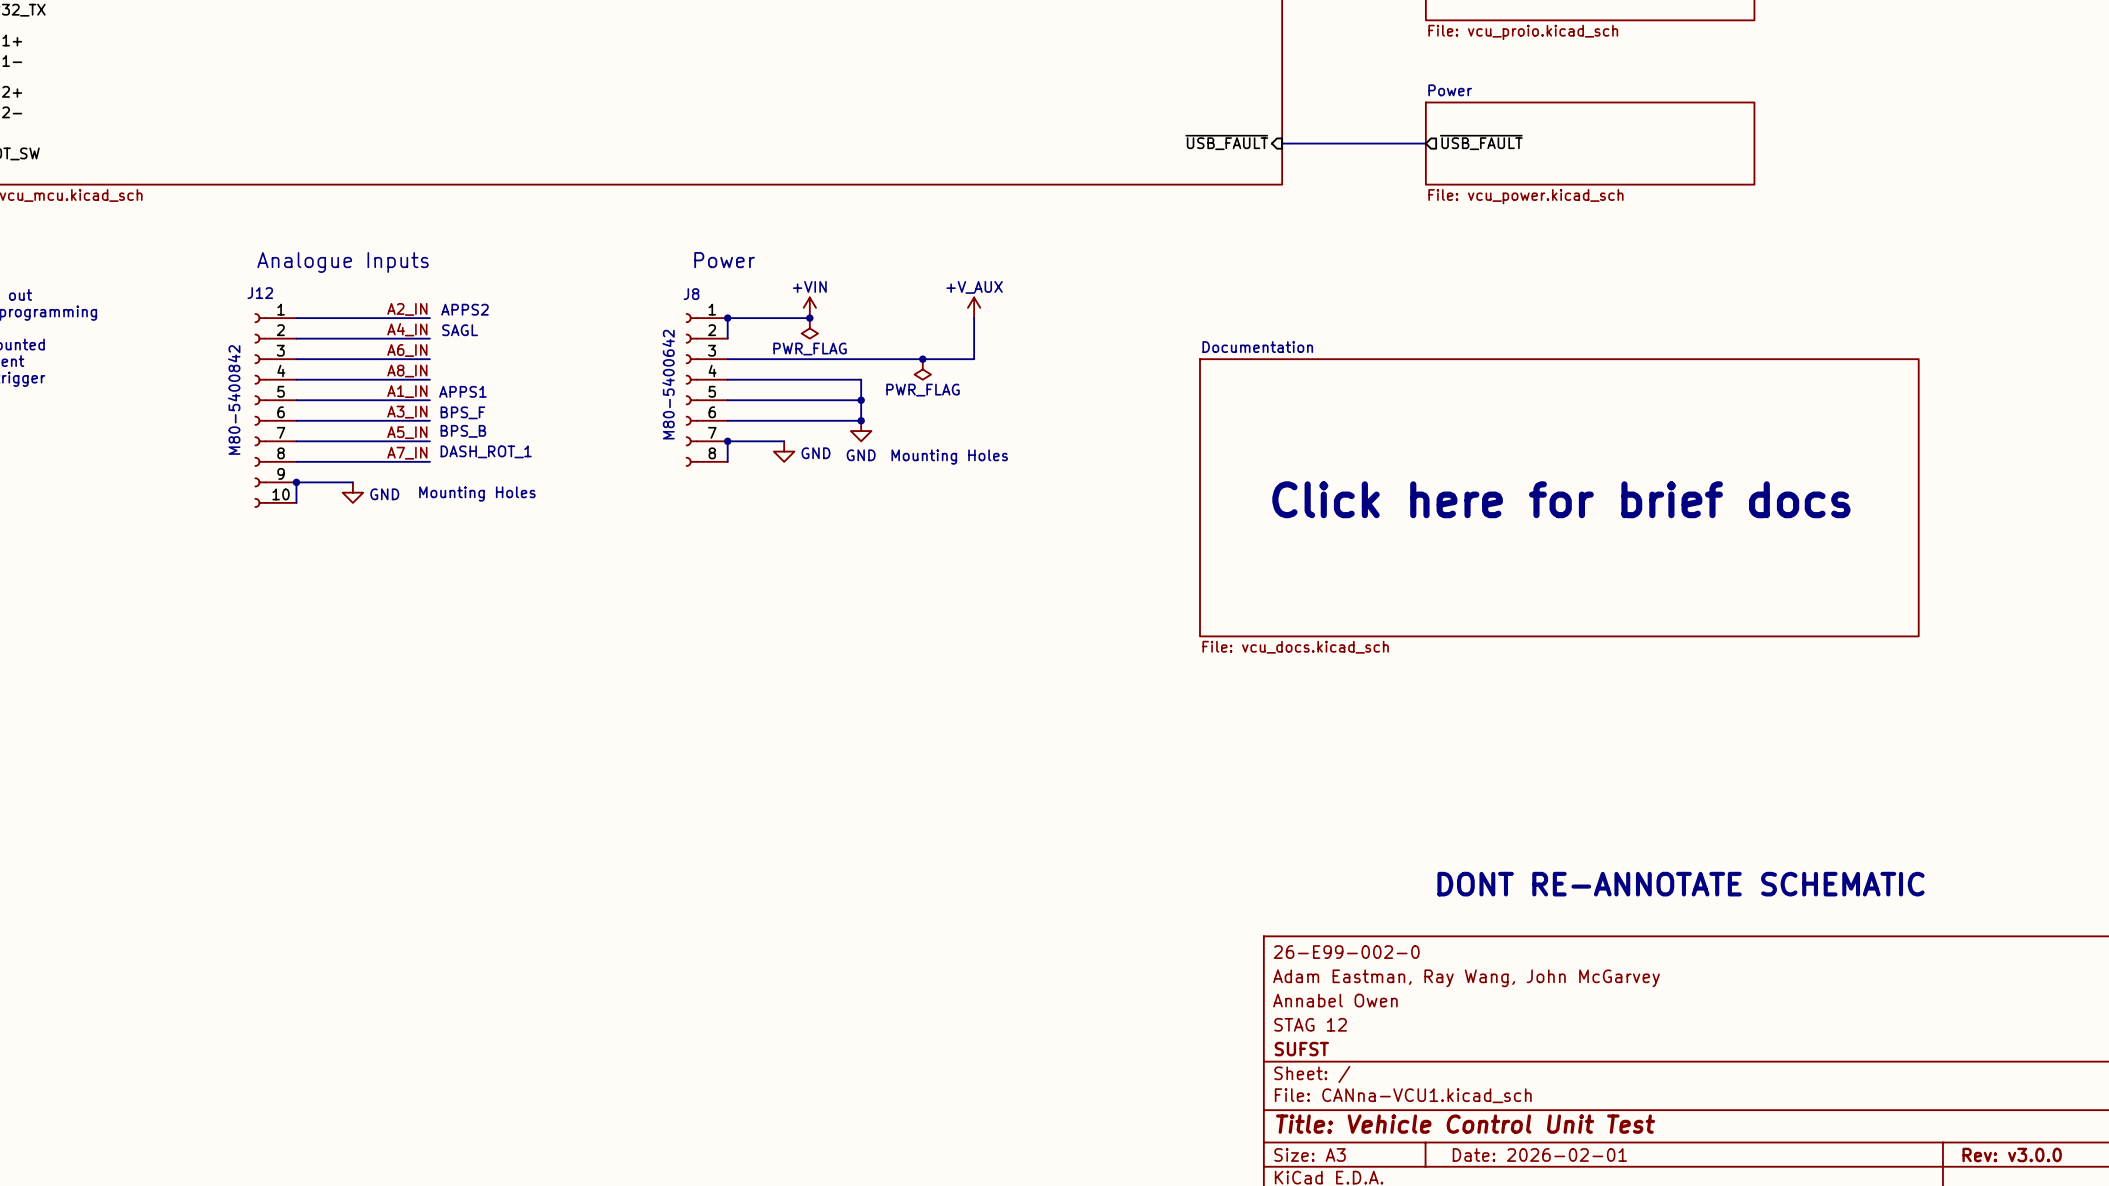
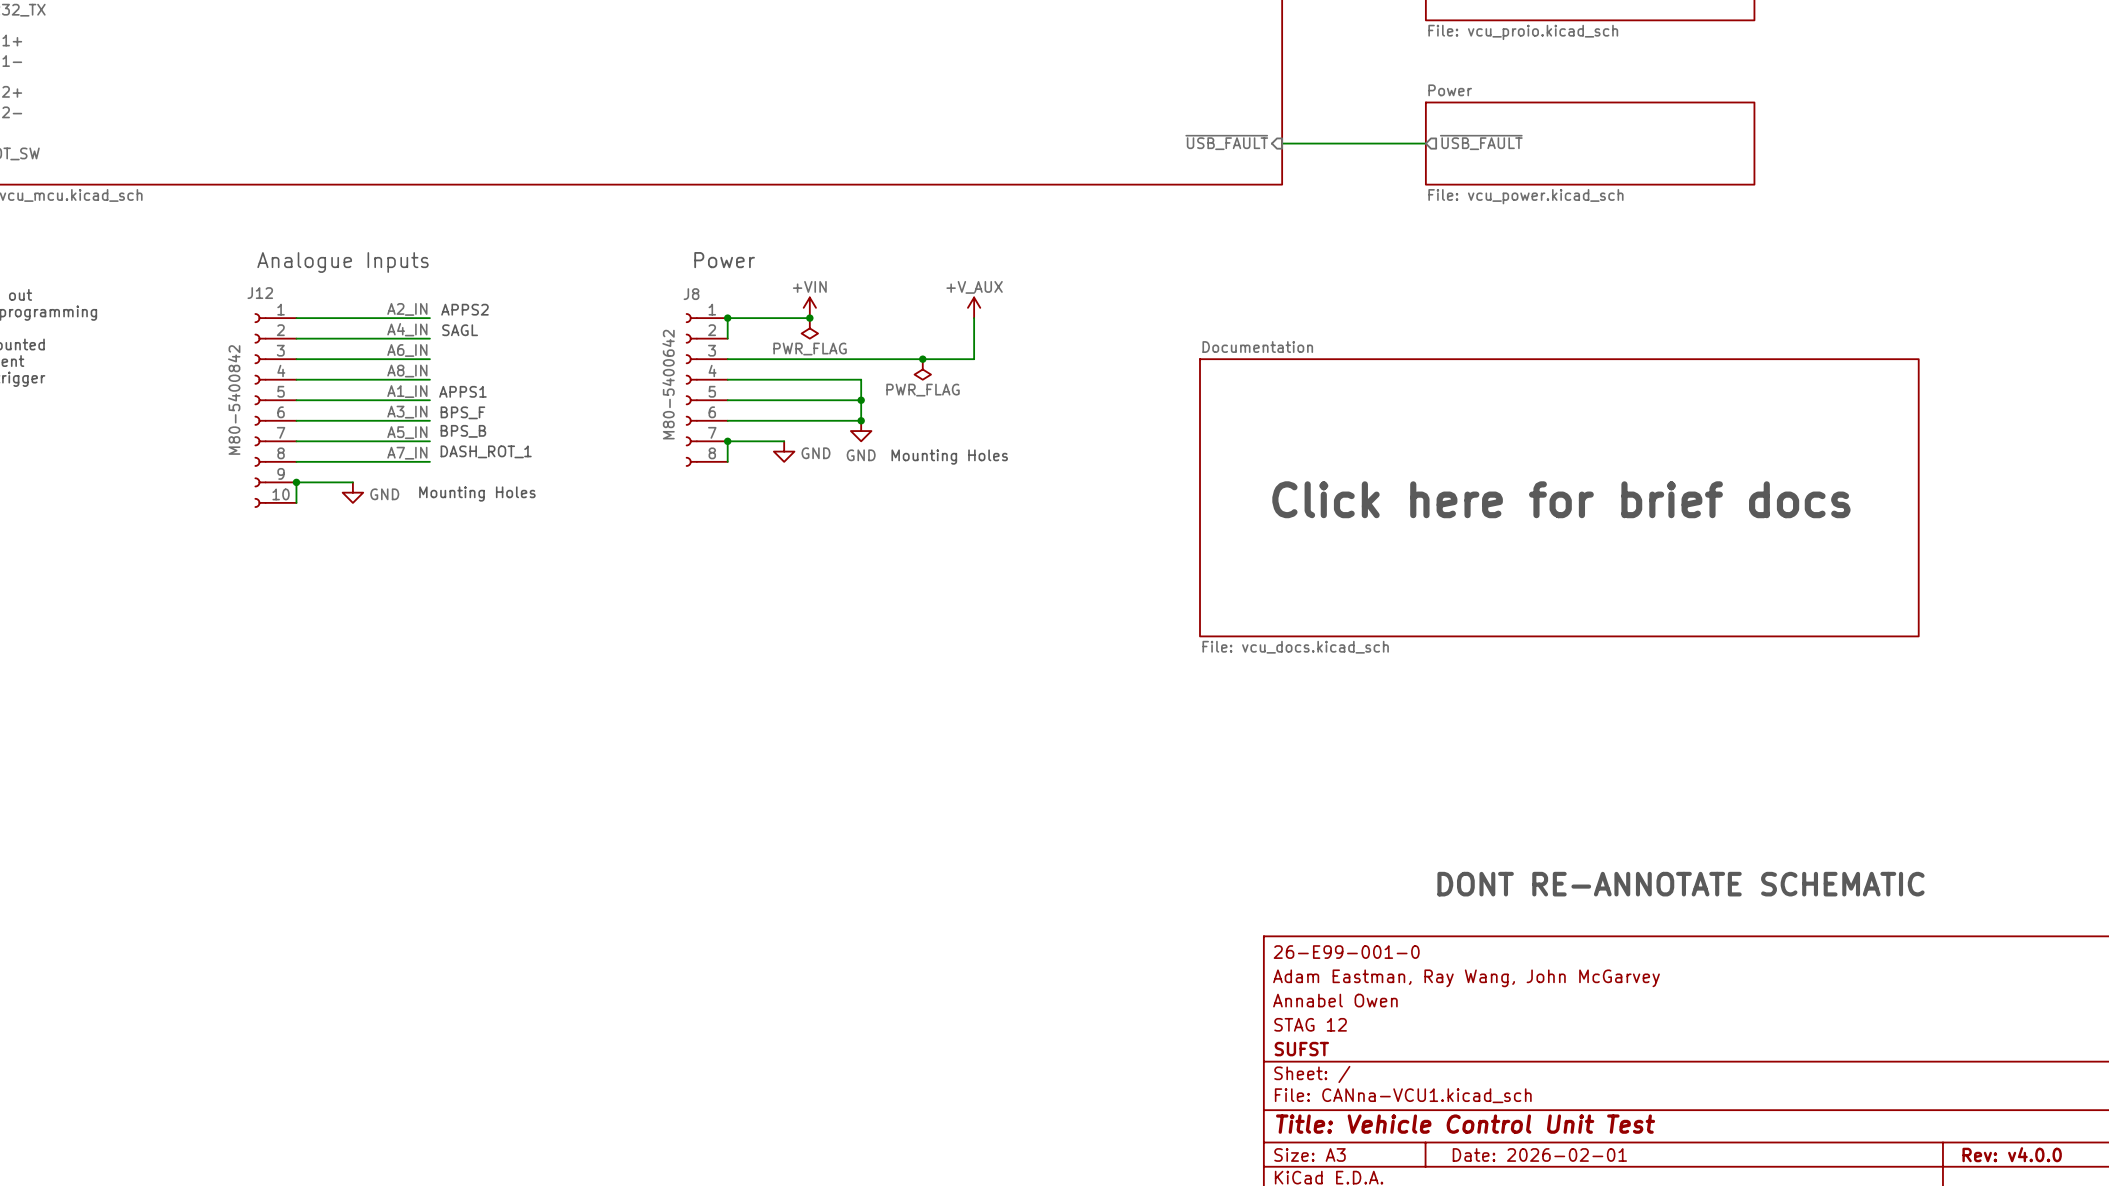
title block: 26-E99-002-0 (1346, 952) -> 26-E99-001-0 (1346, 952)
title block: Rev: v3.0.0 (2012, 1154) -> Rev: v4.0.0 (2012, 1154)

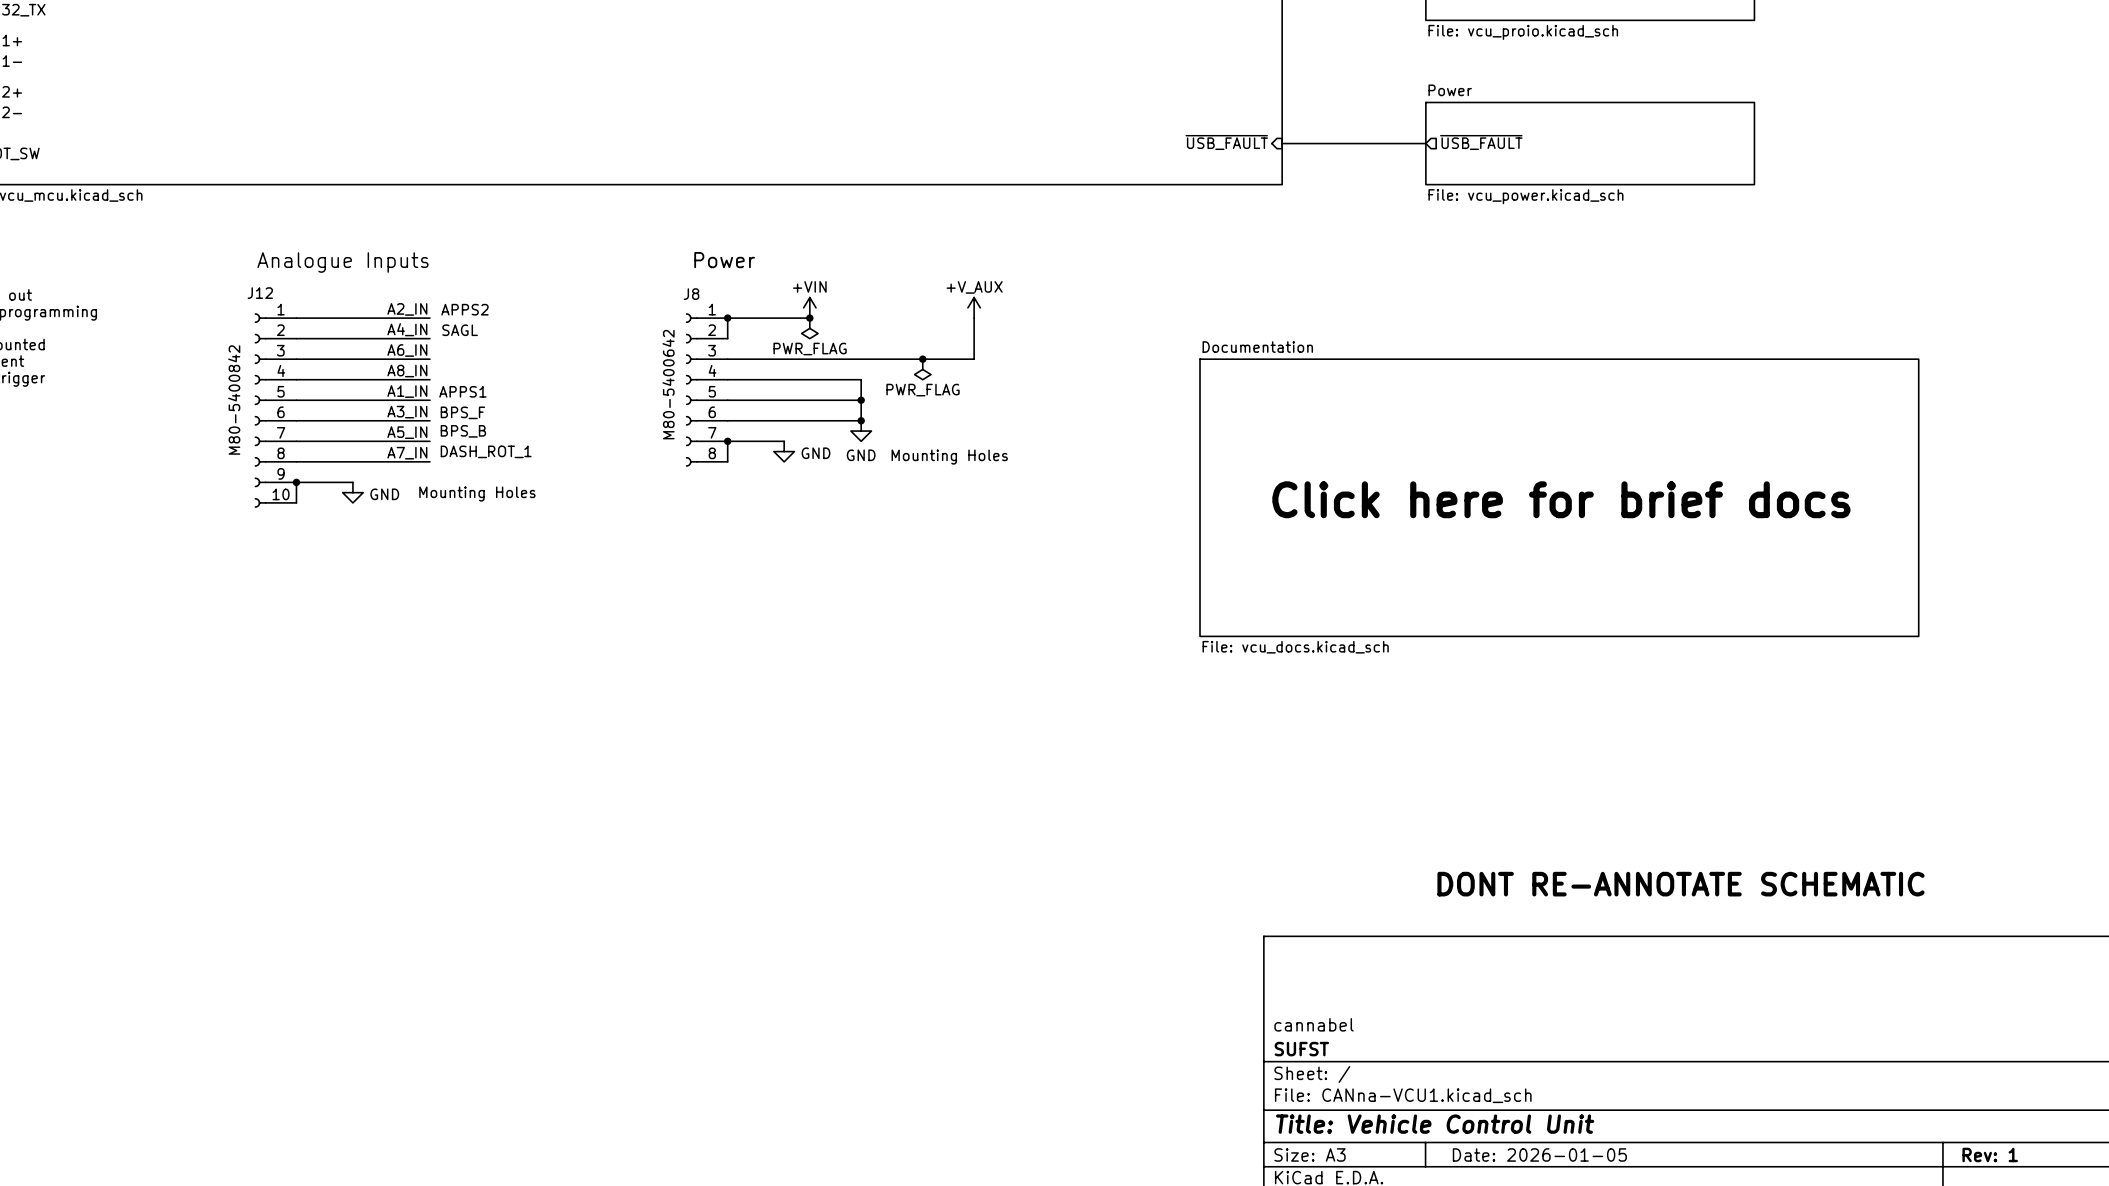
title block: 26-E99-001-0 (1346, 952) -> none
title block: Adam Eastman, Ray Wang, John McGarvey (1466, 978) -> none
title block: Annabel Owen (1335, 1000) -> none
title block: STAG 12 (1310, 1024) -> cannabel (1314, 1024)
title block: Title: Vehicle Control Unit Test (1465, 1124) -> Title: Vehicle Control Unit (1435, 1124)
title block: Date: 2026-02-01 (1539, 1154) -> Date: 2026-01-05 (1539, 1154)
title block: Rev: v4.0.0 (2012, 1154) -> Rev: 1 (1990, 1154)

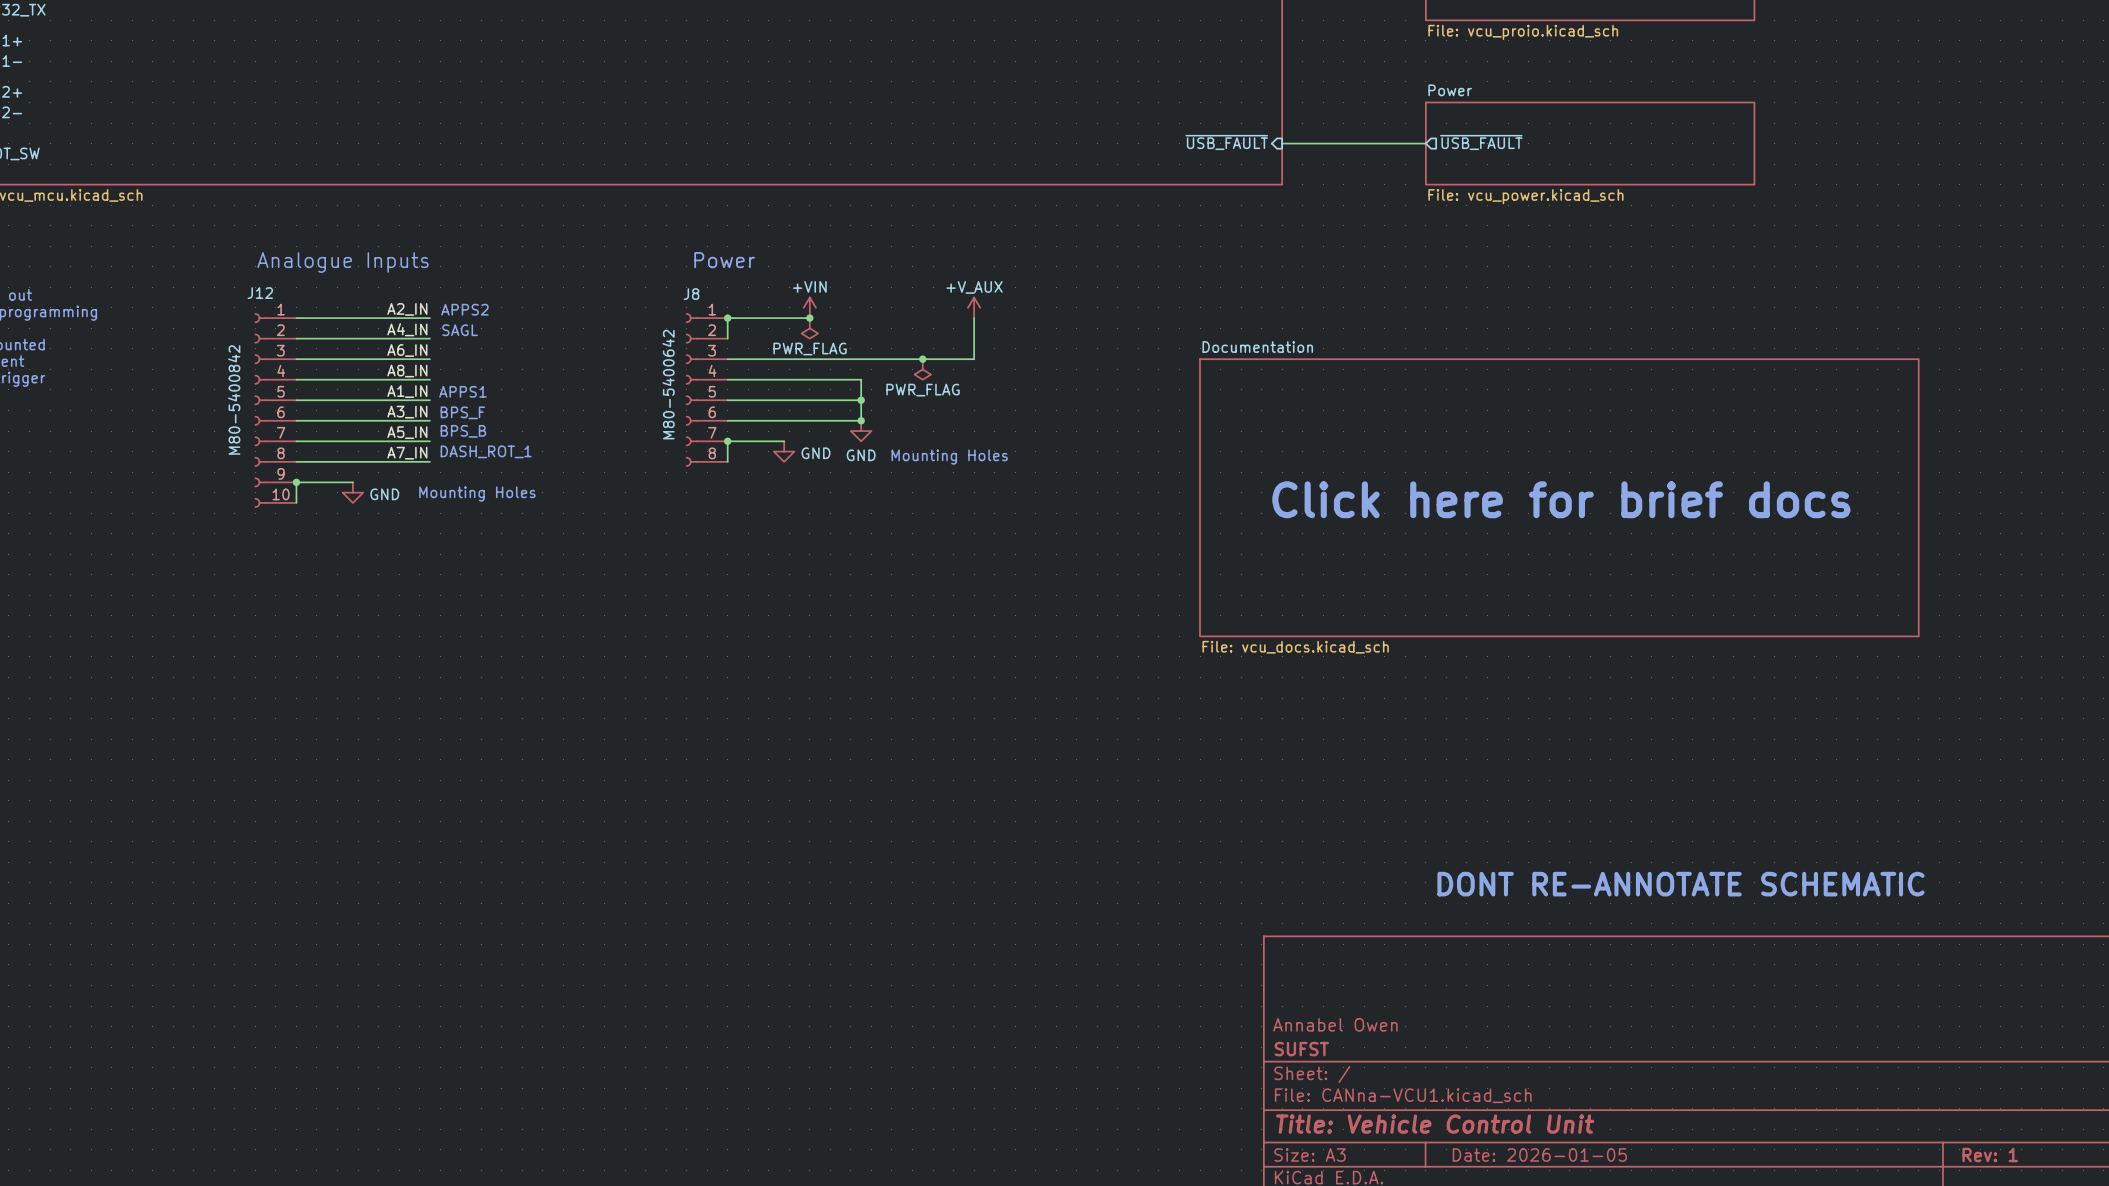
title block: cannabel (1314, 1024) -> Annabel Owen (1335, 1024)

